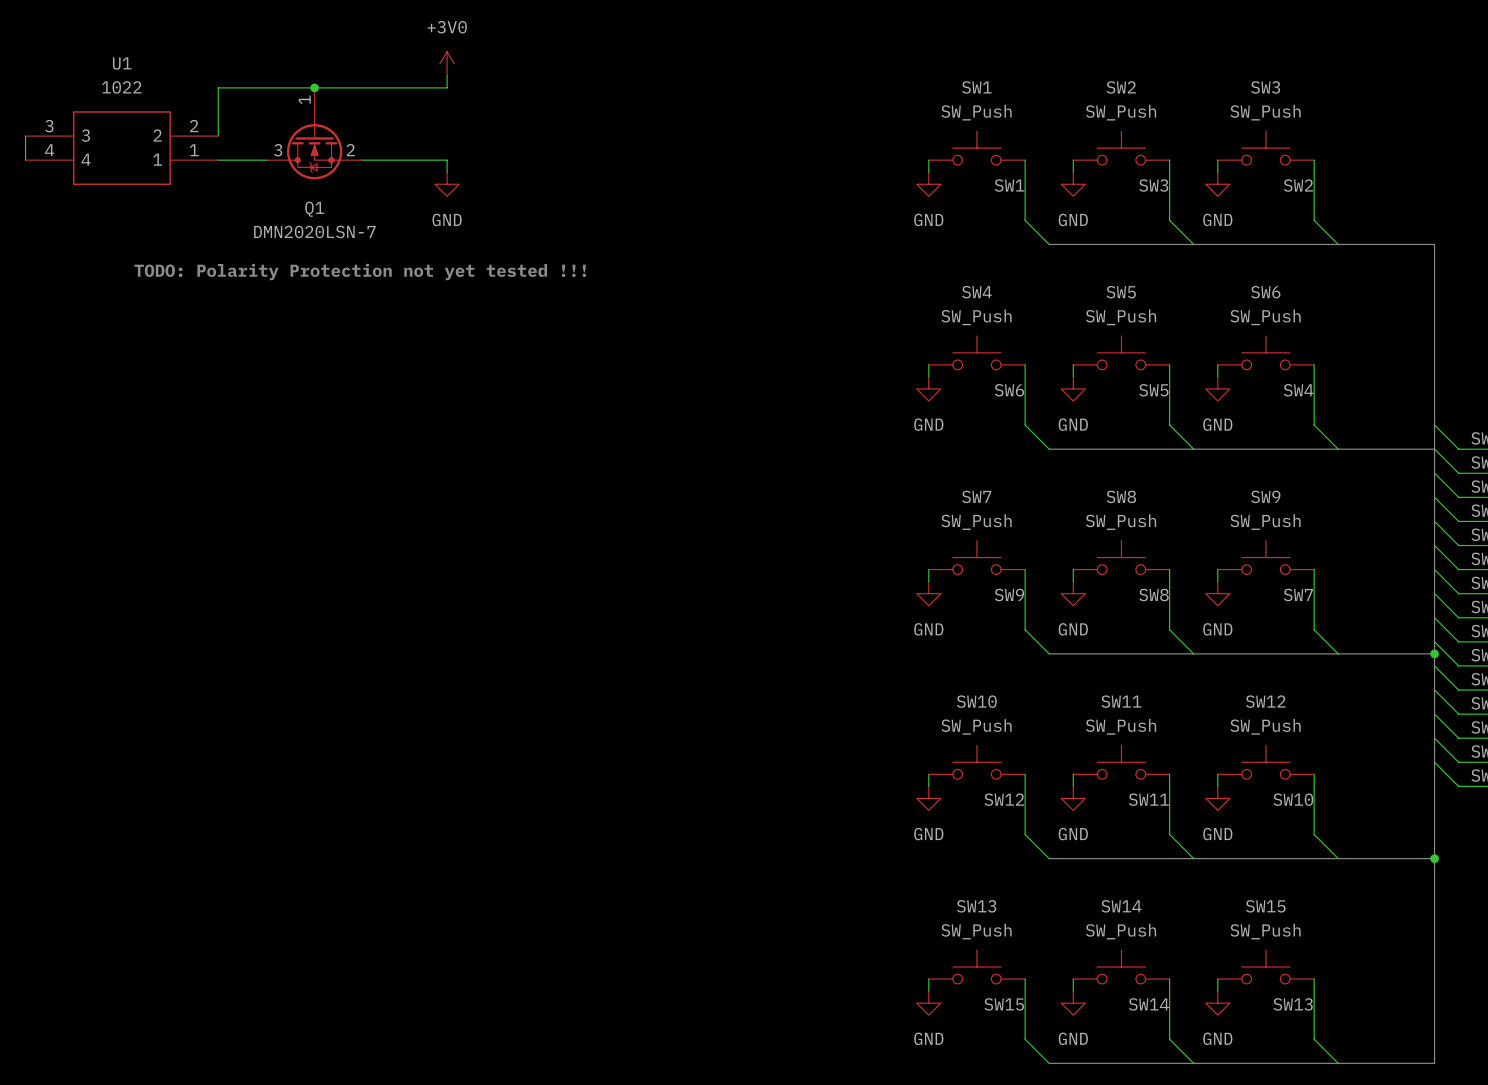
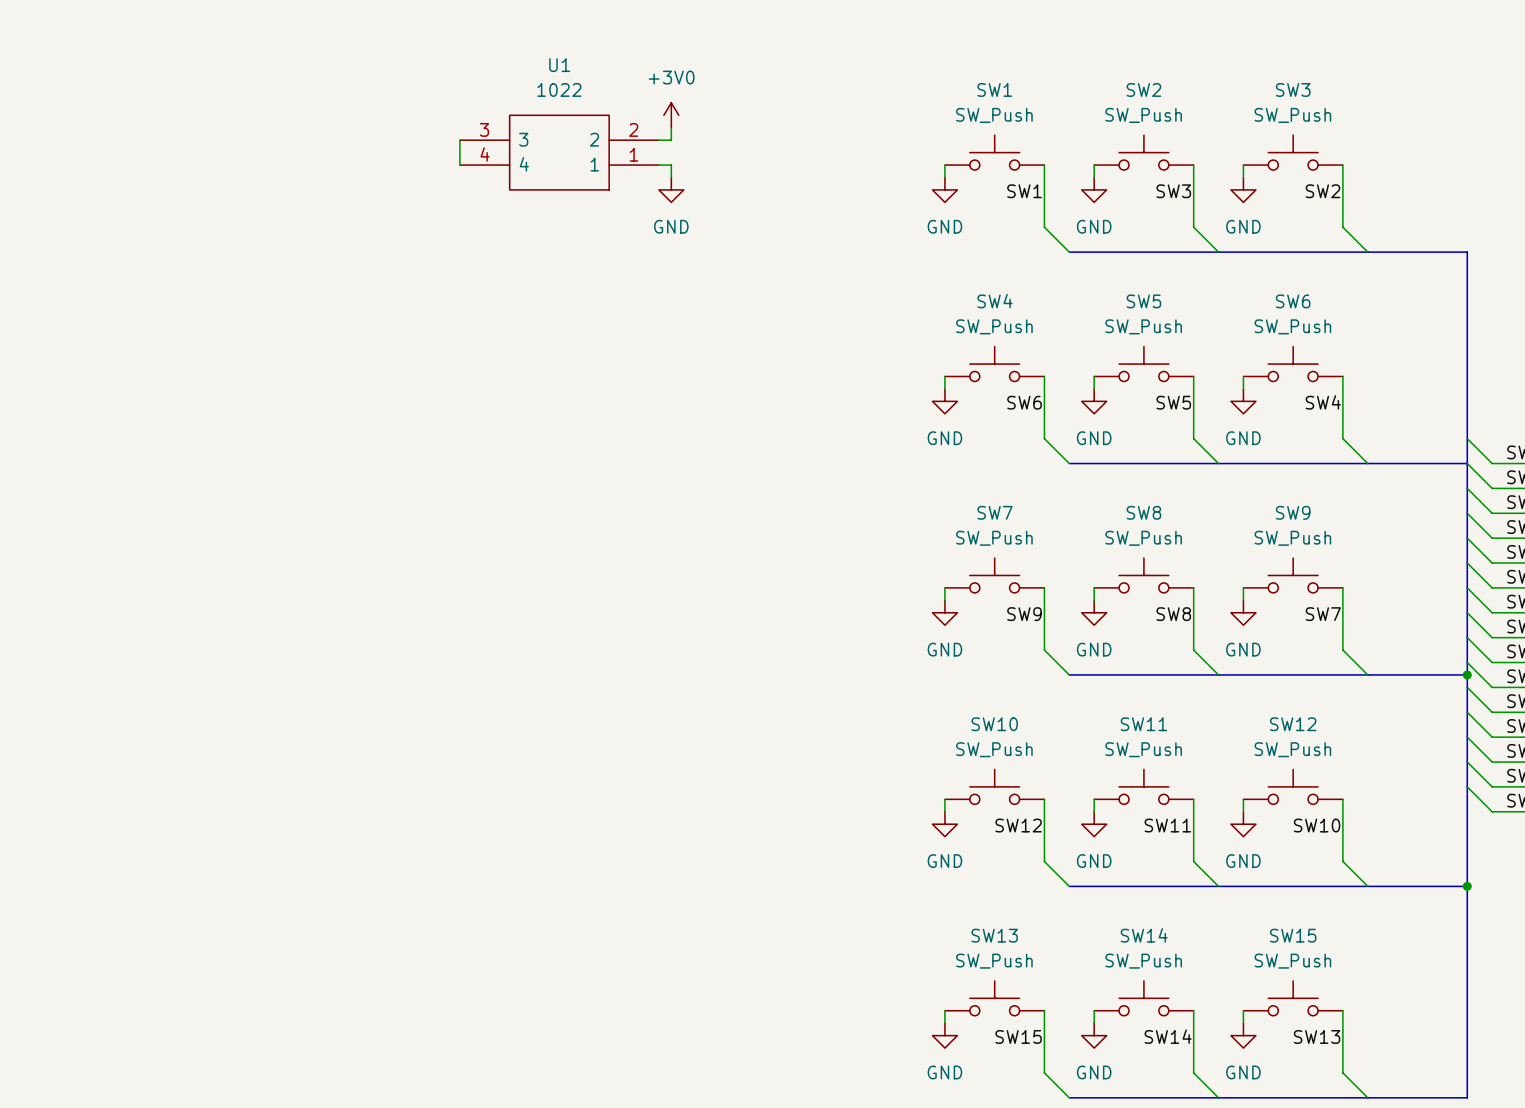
power symbol position: +3V0 (447, 63) -> +3V0 (671, 115)
wire: (447, 75) (447, 87) (218, 87) (218, 136) -> none
junction: (314, 87) -> none
wire: none -> (671, 127) (671, 140) (658, 140)
Q1: DMN2020LSN-7 (314, 133) -> none
wire: (25, 136) (25, 160) -> none
wire: none -> (459, 140) (459, 165)
U1 position: (121, 148) -> (559, 152)
wire: (218, 160) (266, 160) -> none
wire: (362, 160) (447, 160) (447, 172) -> none
wire: none -> (658, 165) (671, 165) (671, 177)
power symbol position: GND (447, 184) -> GND (671, 189)
text: TODO: Polarity Protection not yet tested !!! (360, 271) -> none

